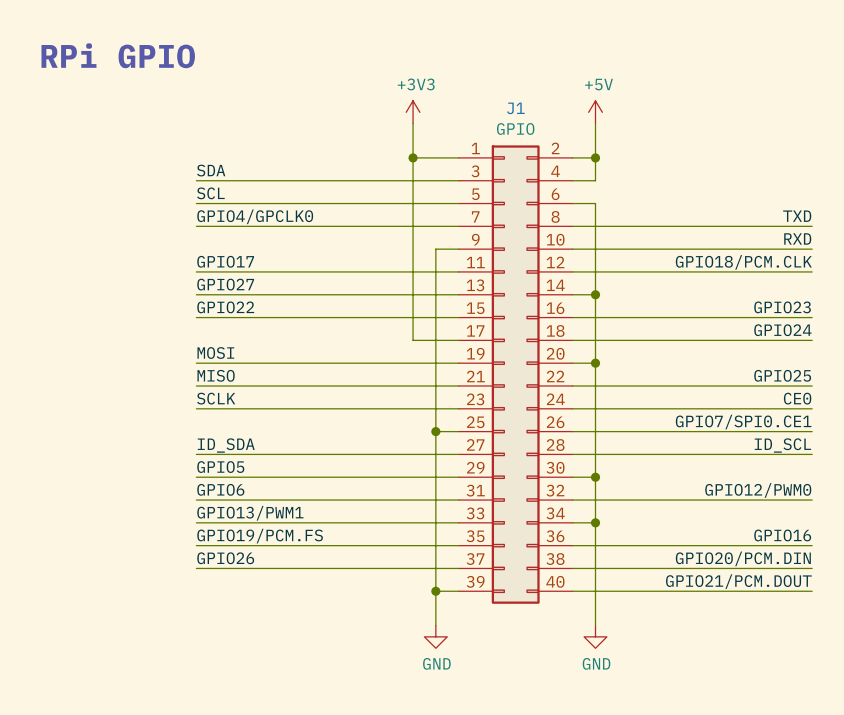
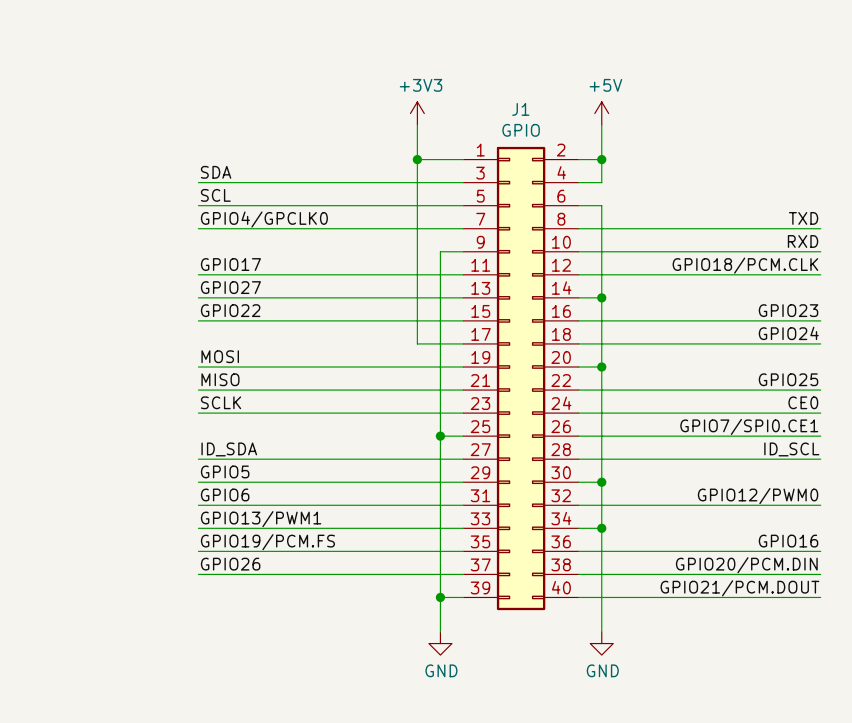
text: RPi GPIO (118, 55) -> none

